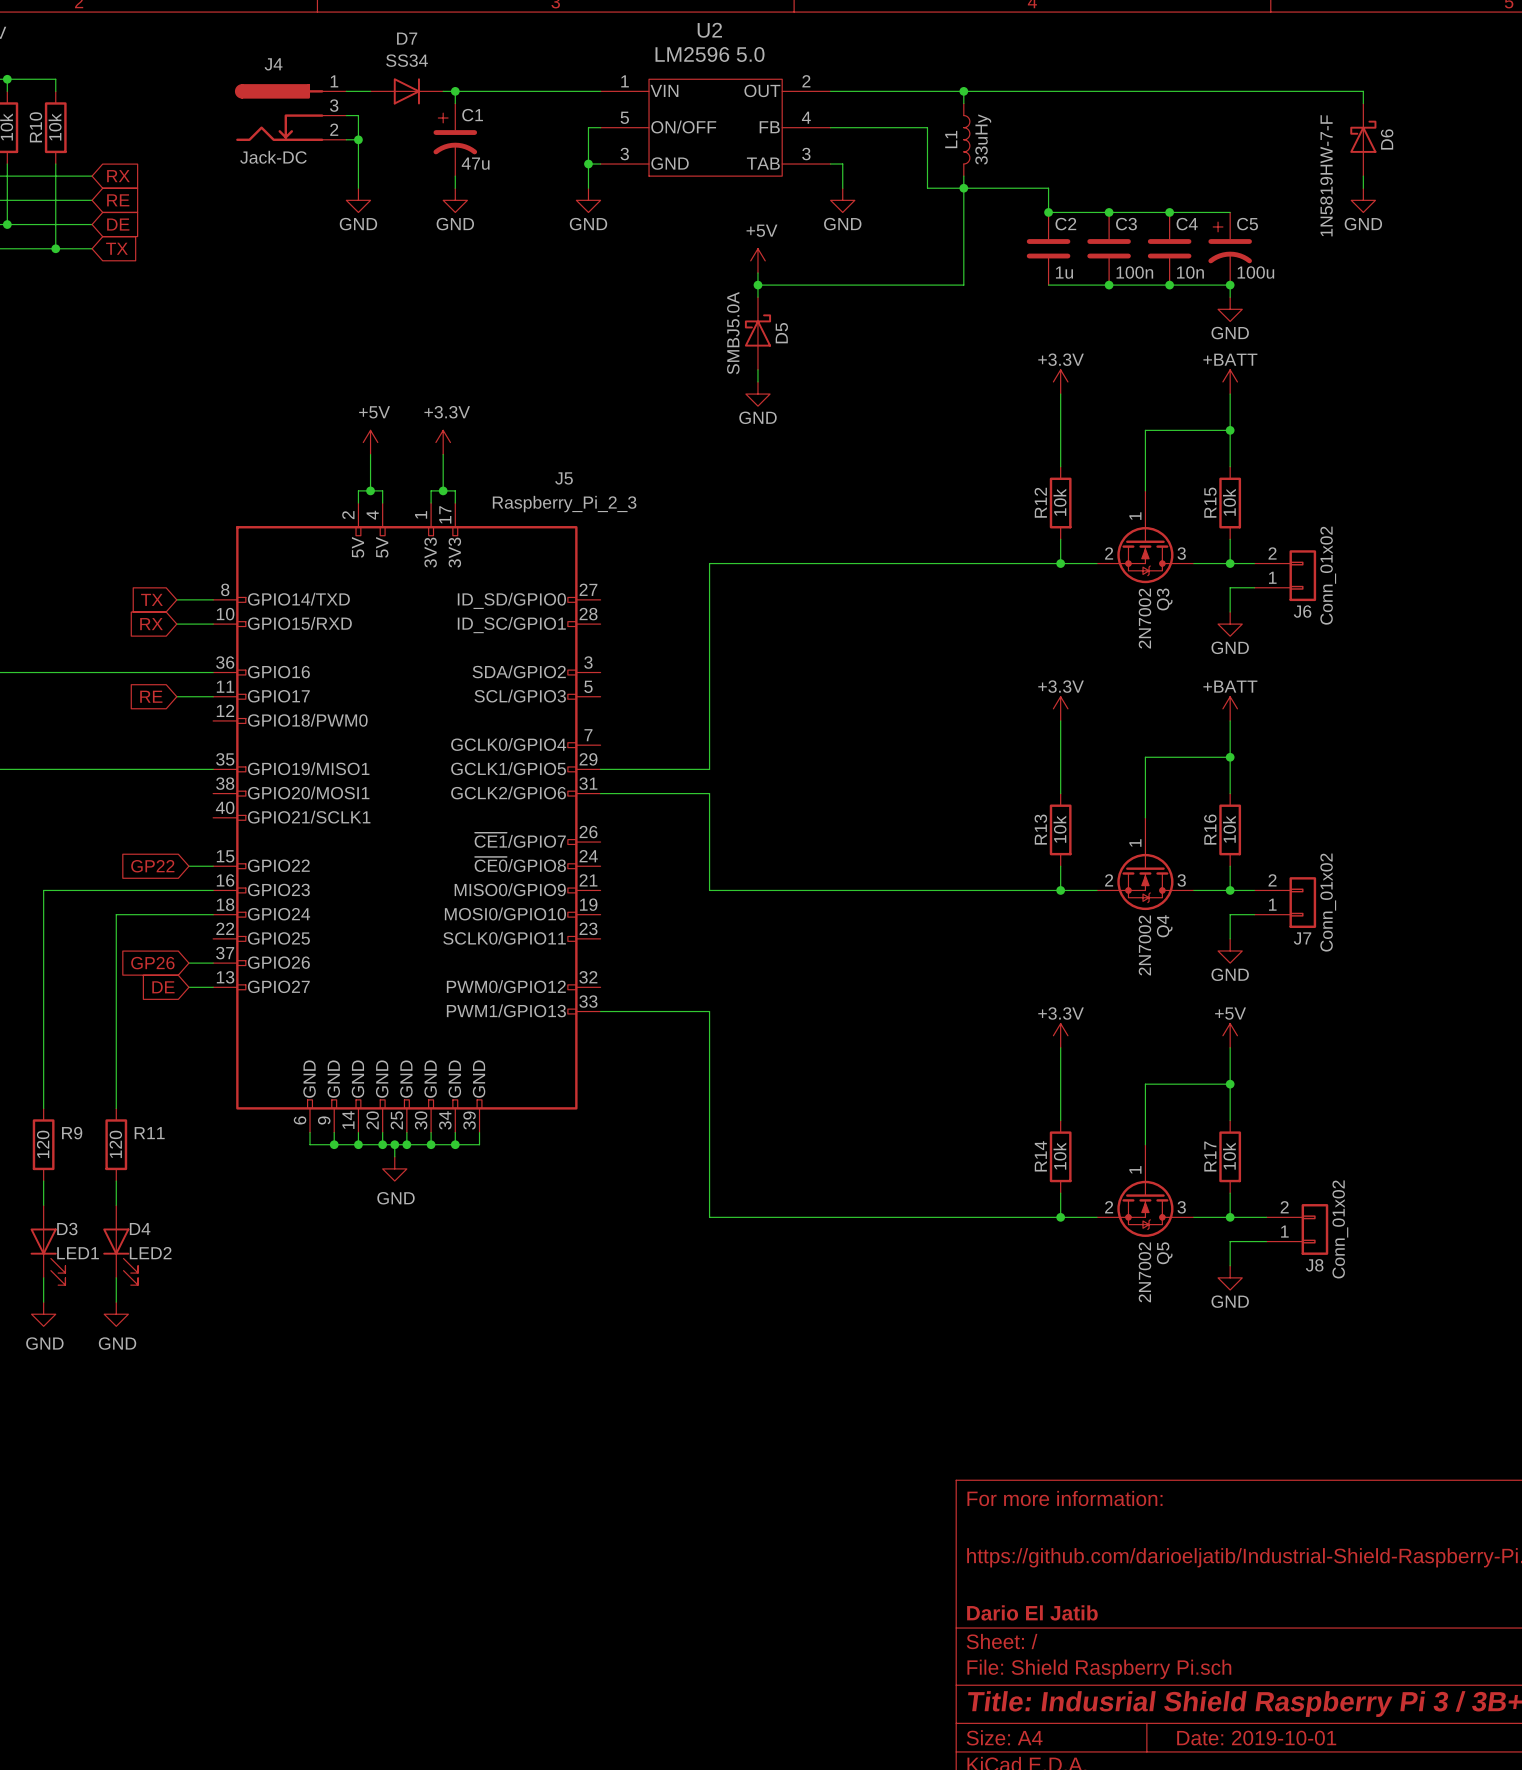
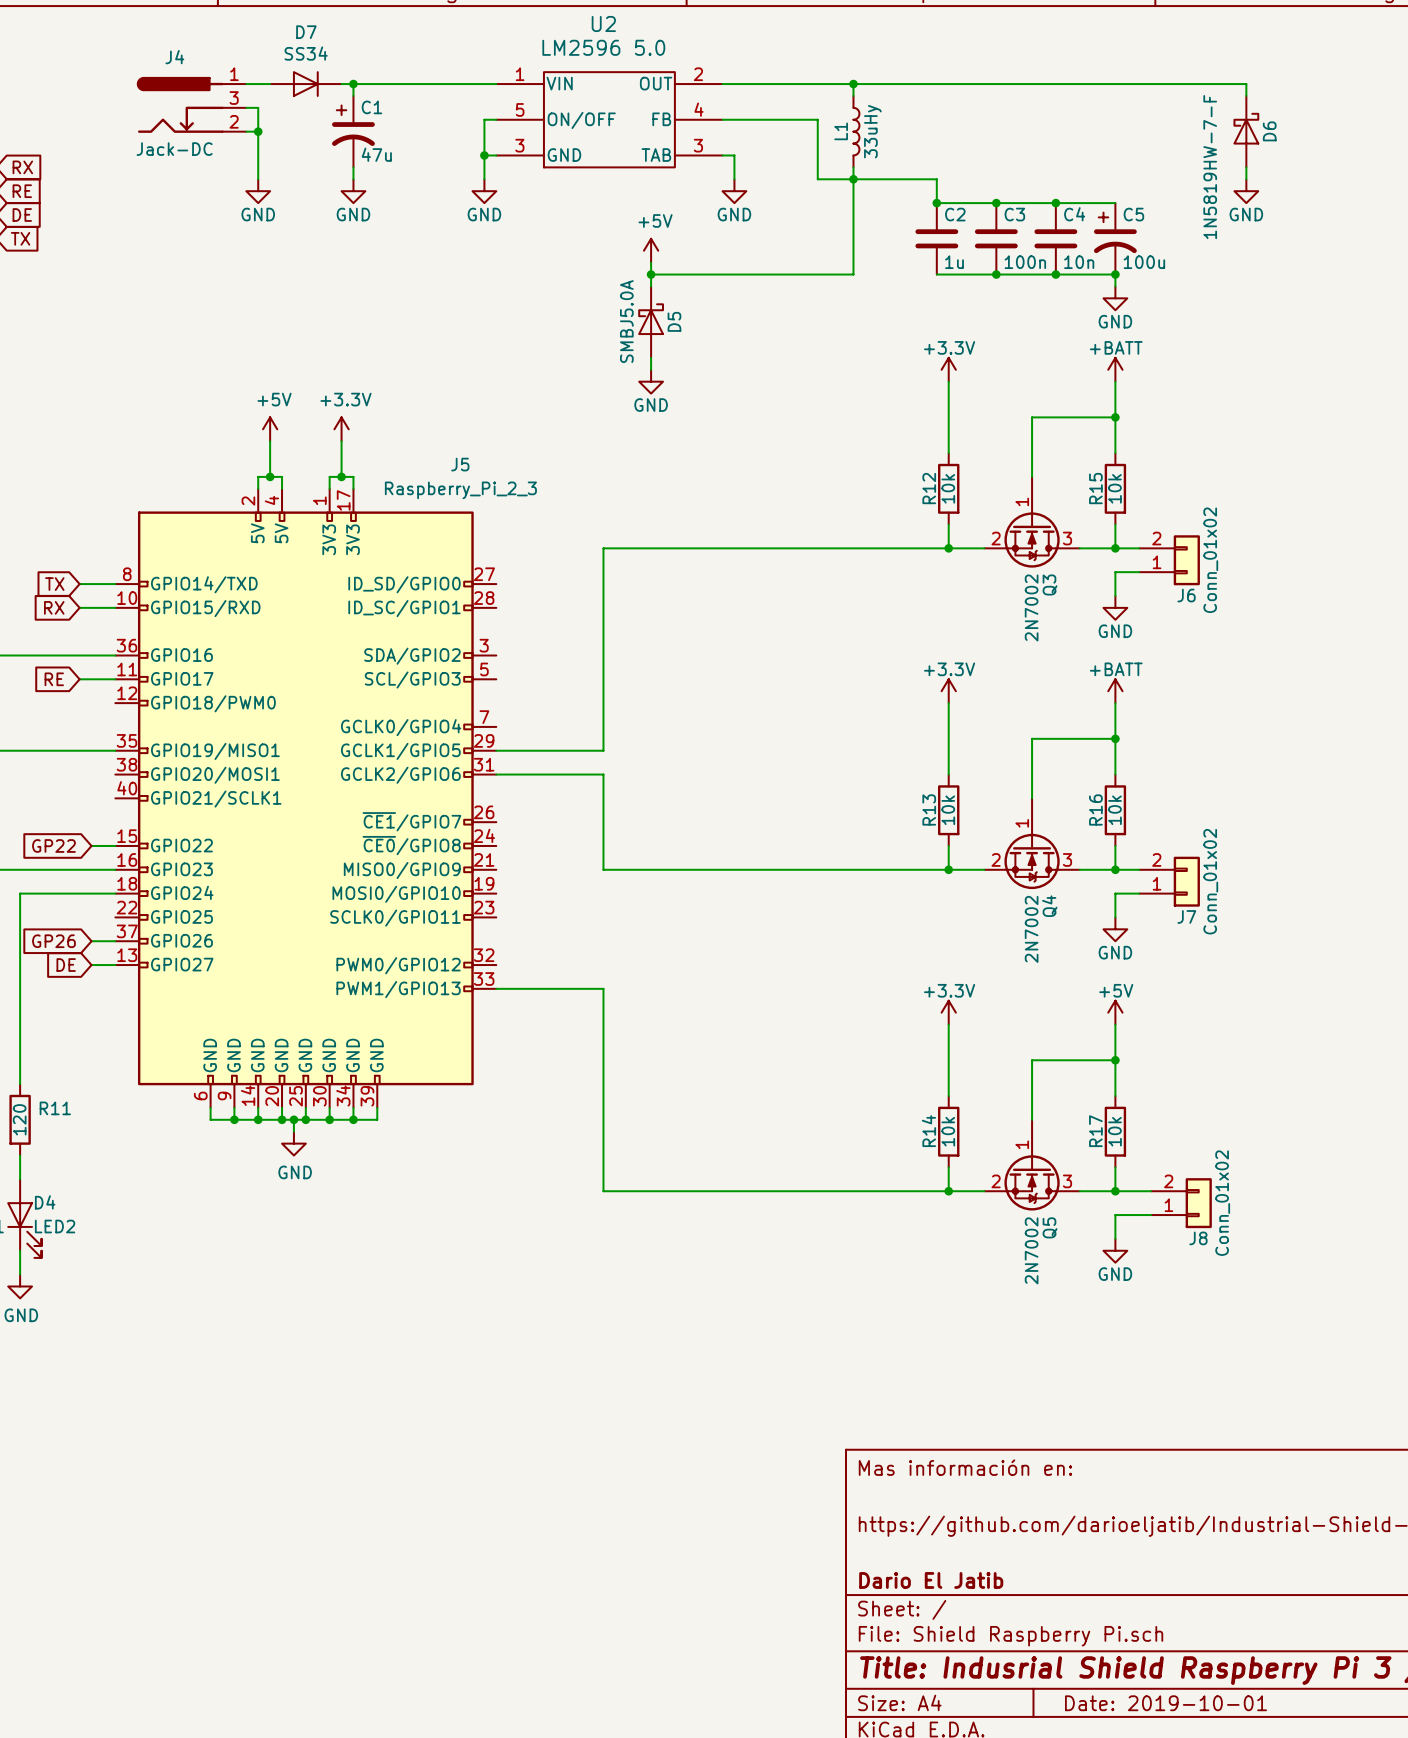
title block: For more information: (1064, 1498) -> Mas información en: (965, 1467)

